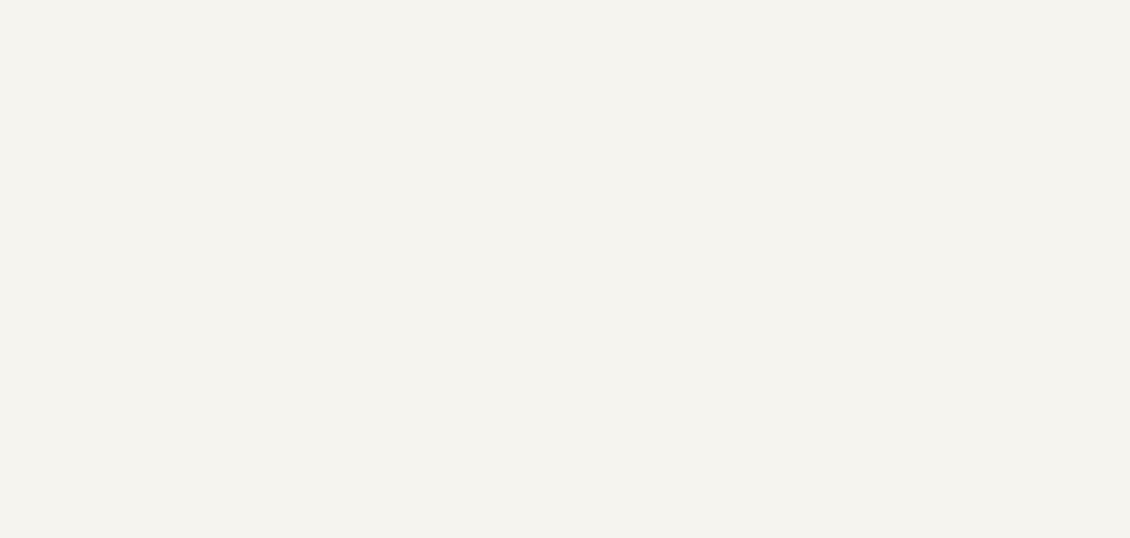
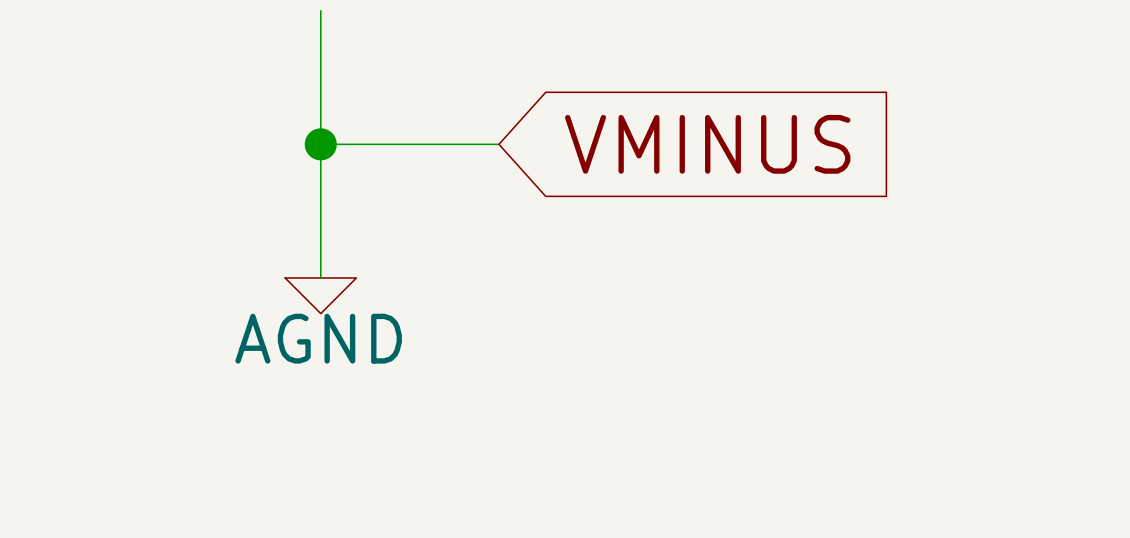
wire: none -> (320, 10) (320, 277)
wire: none -> (320, 144) (498, 144)
junction: none -> (320, 144)
global label: none -> VMINUS (707, 144)
power symbol: none -> AGND (320, 295)

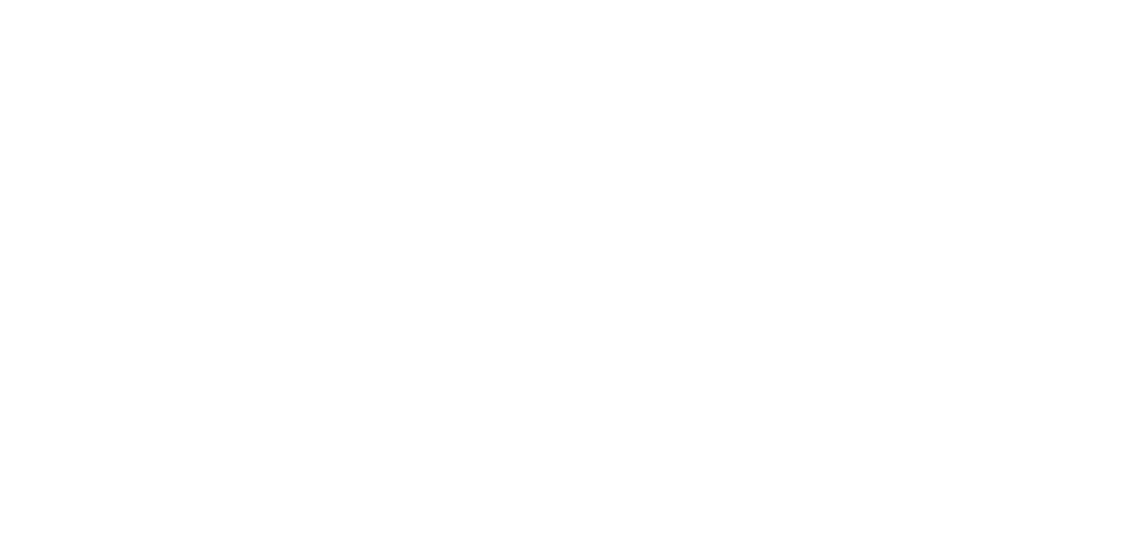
wire: (320, 10) (320, 277) -> none
wire: (320, 144) (498, 144) -> none
junction: (320, 144) -> none
global label: VMINUS (707, 144) -> none
power symbol: AGND (320, 295) -> none

